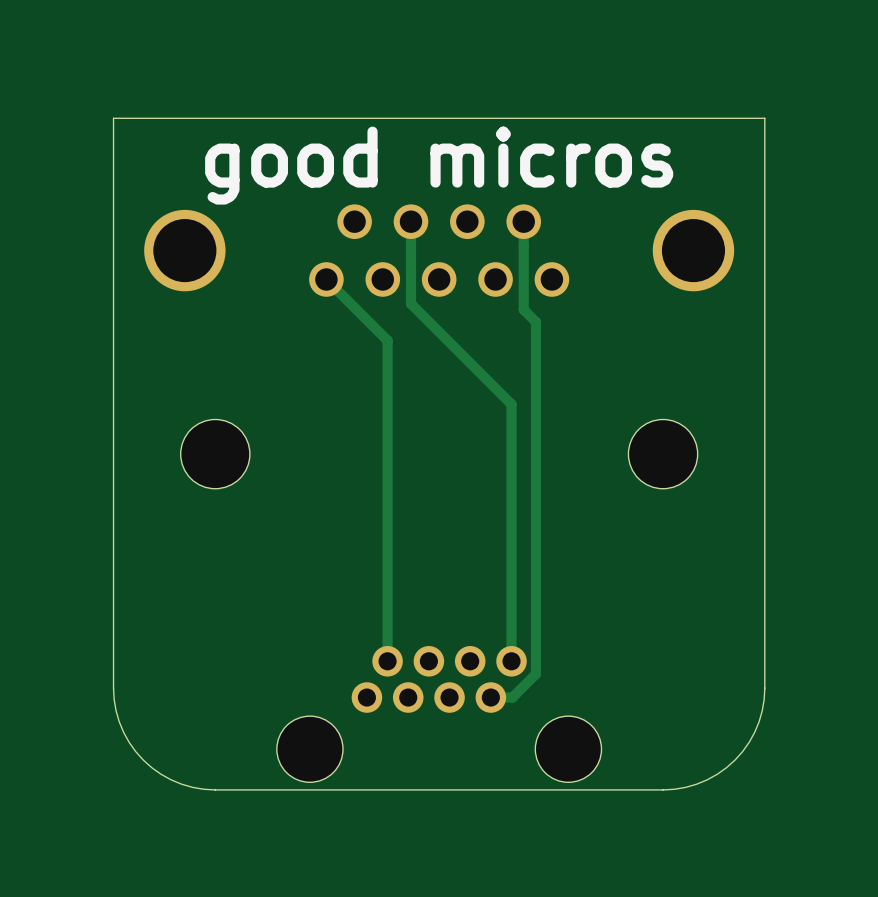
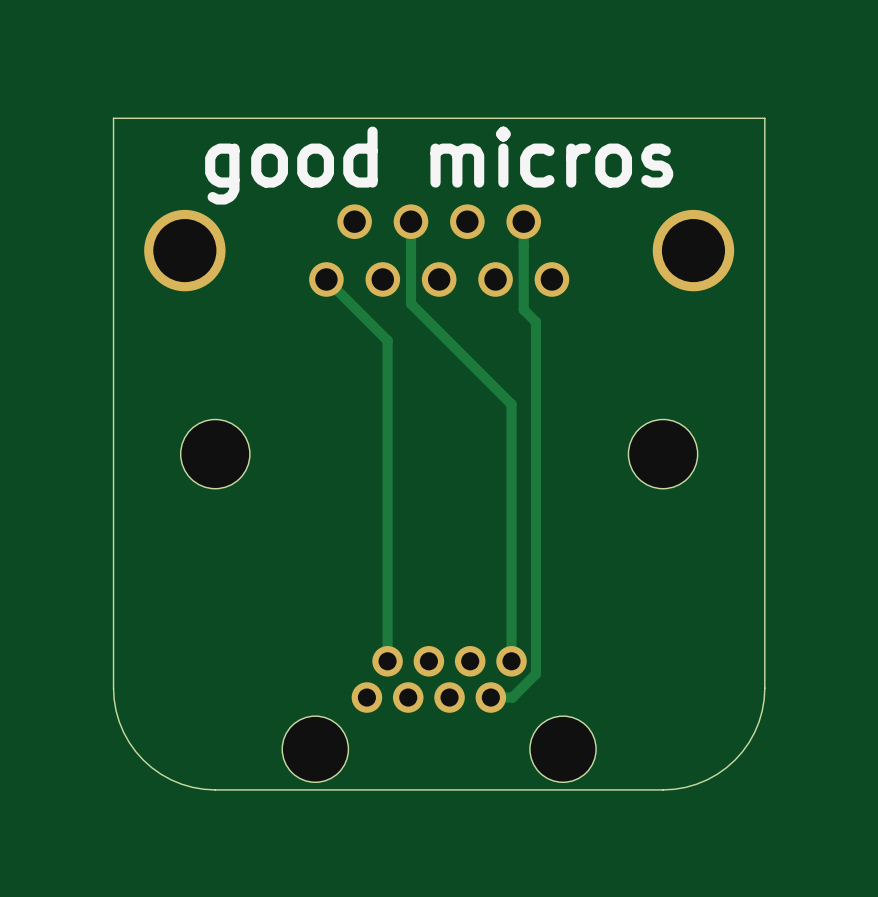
part footprint: [276, 646, 602, 783] -> [282, 646, 597, 783]

